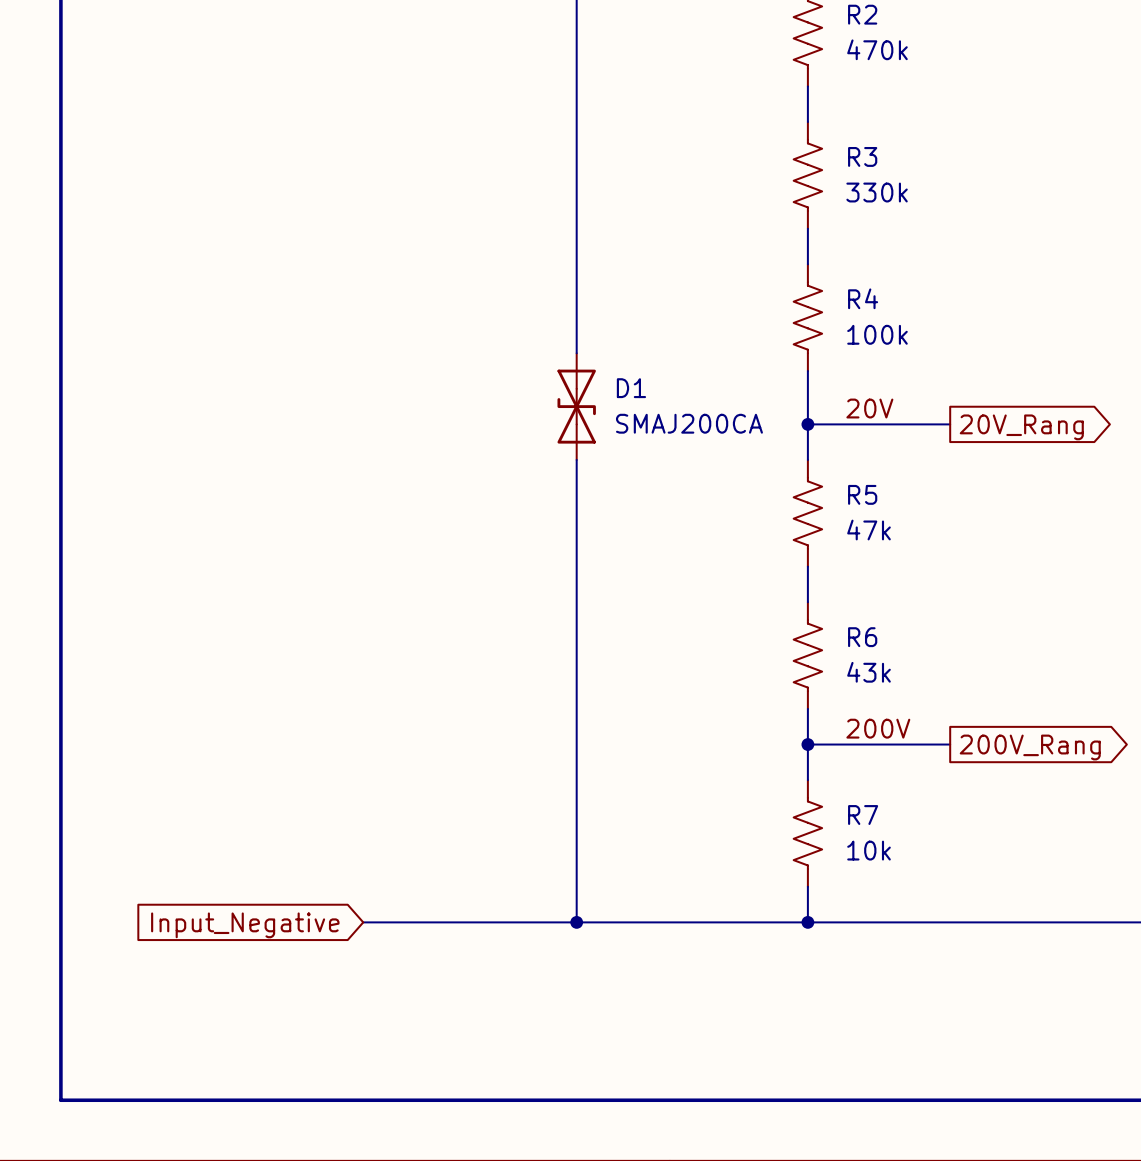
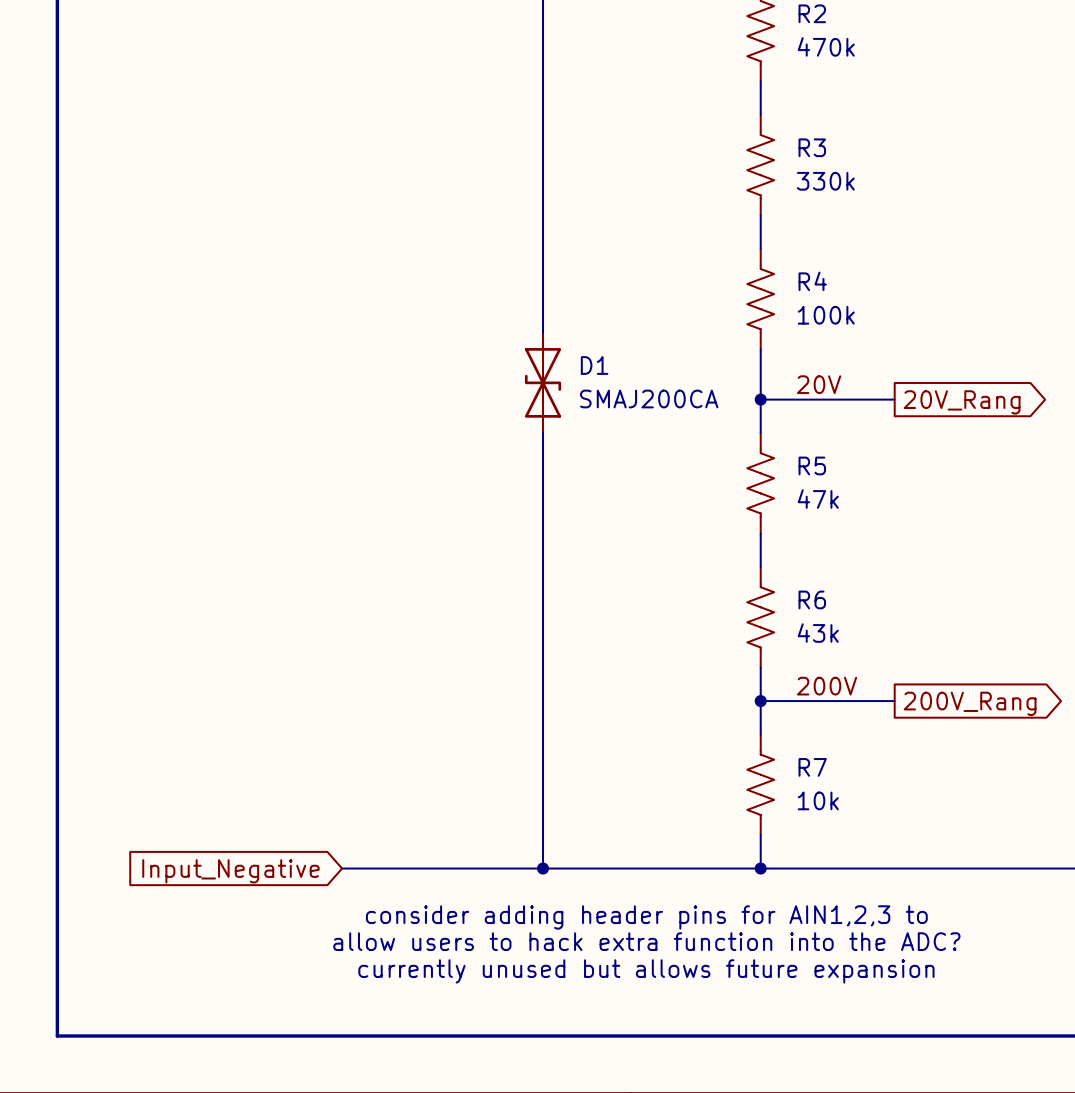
text: none -> consider adding header pins for AIN1,2,3 to (646, 917)
text: none -> allow users to hack extra function into the ADC? (646, 941)
text: none -> currently unused but allows future expansion (646, 971)

